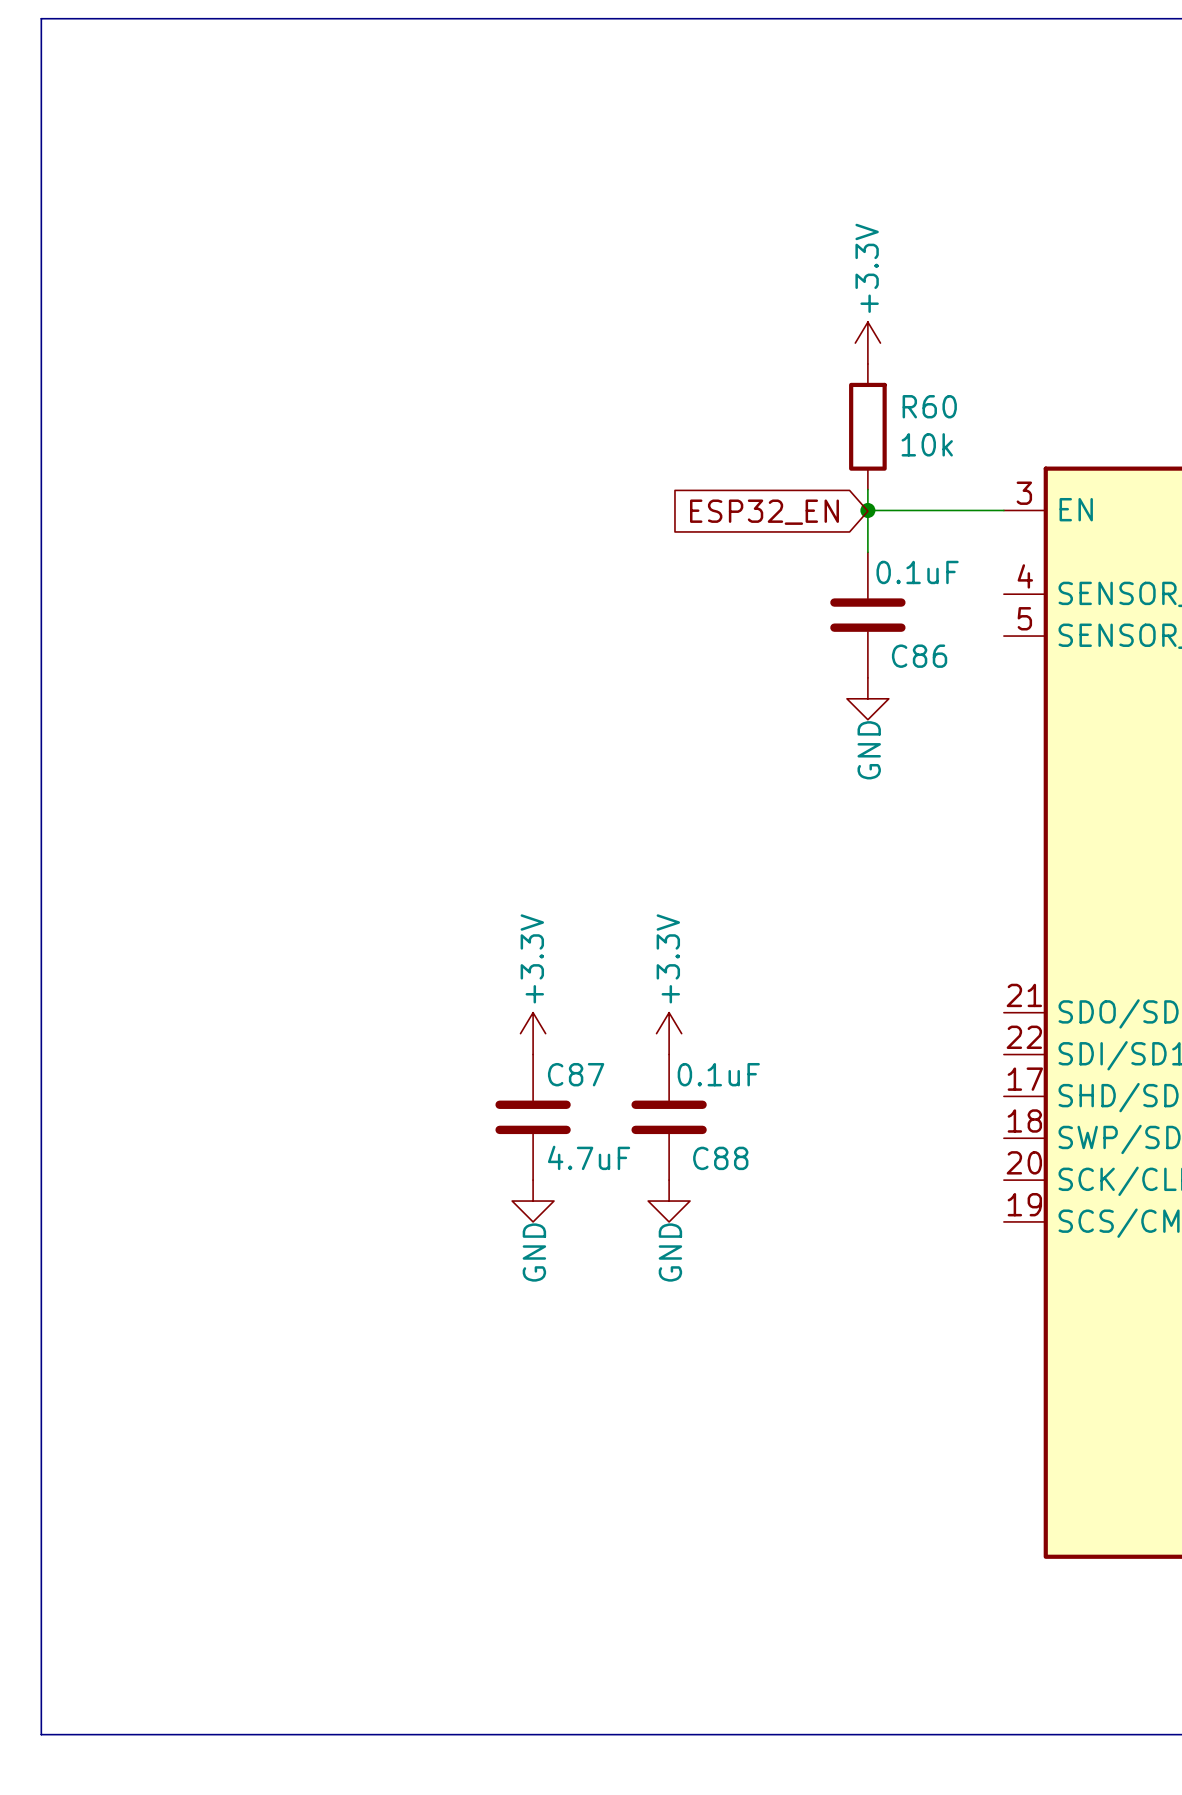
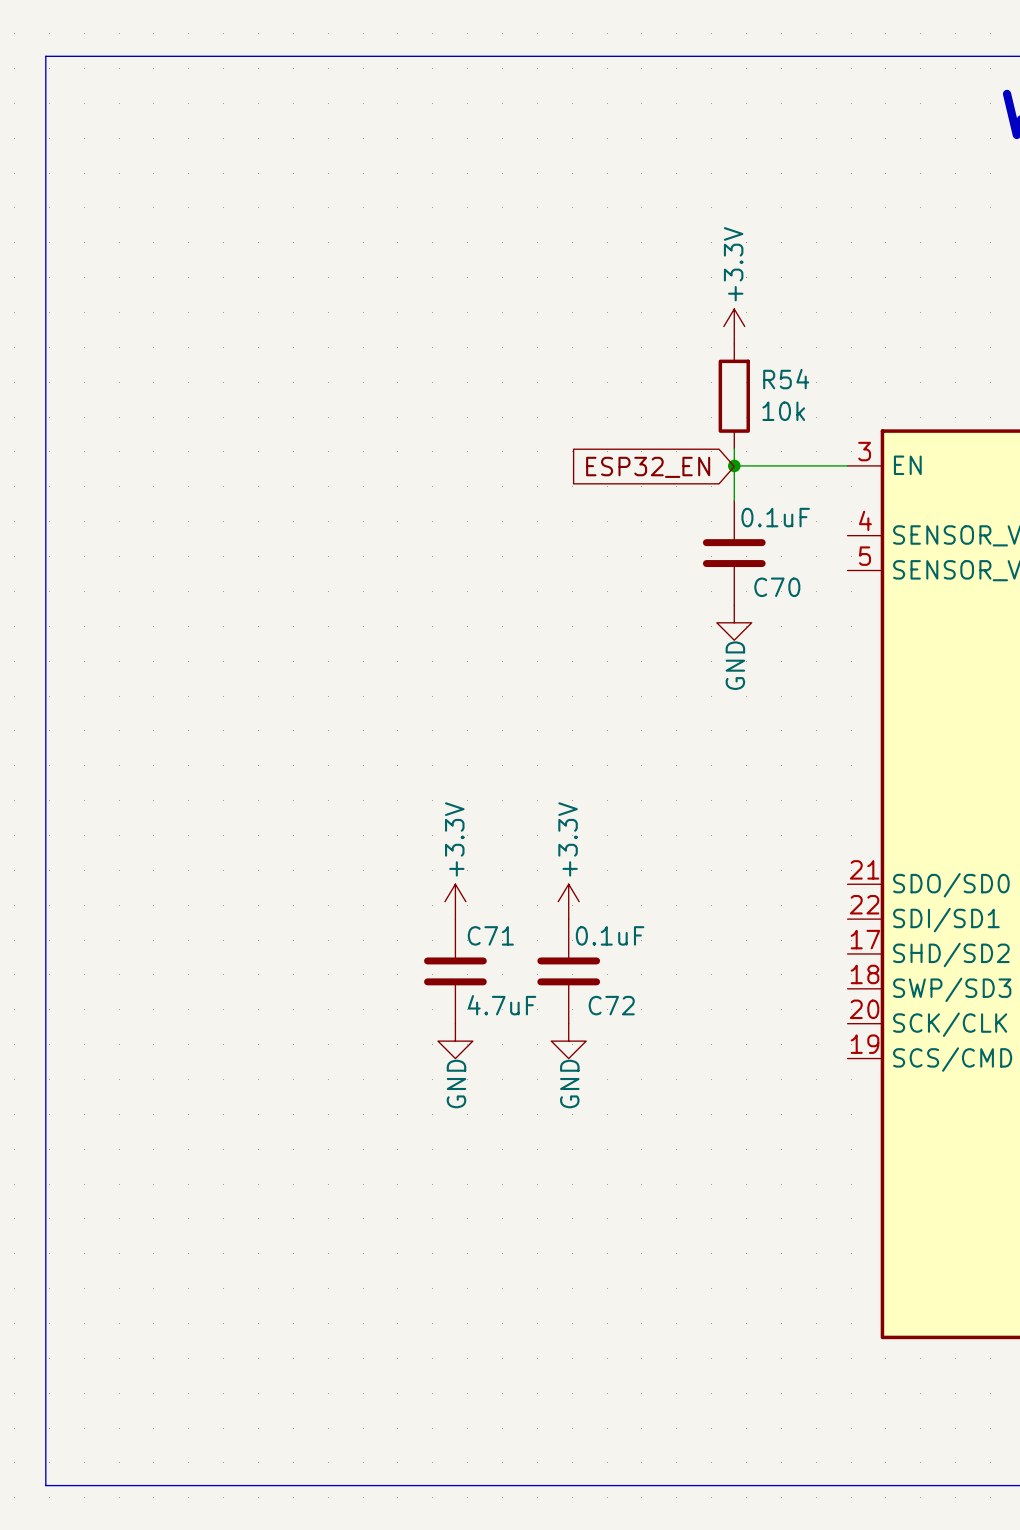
R60 name: R60 (929, 406) -> R54 (786, 379)
C86 name: C86 (919, 656) -> C70 (777, 587)
C87 name: C87 (576, 1074) -> C71 (490, 935)
C88 name: C88 (720, 1158) -> C72 (611, 1005)

